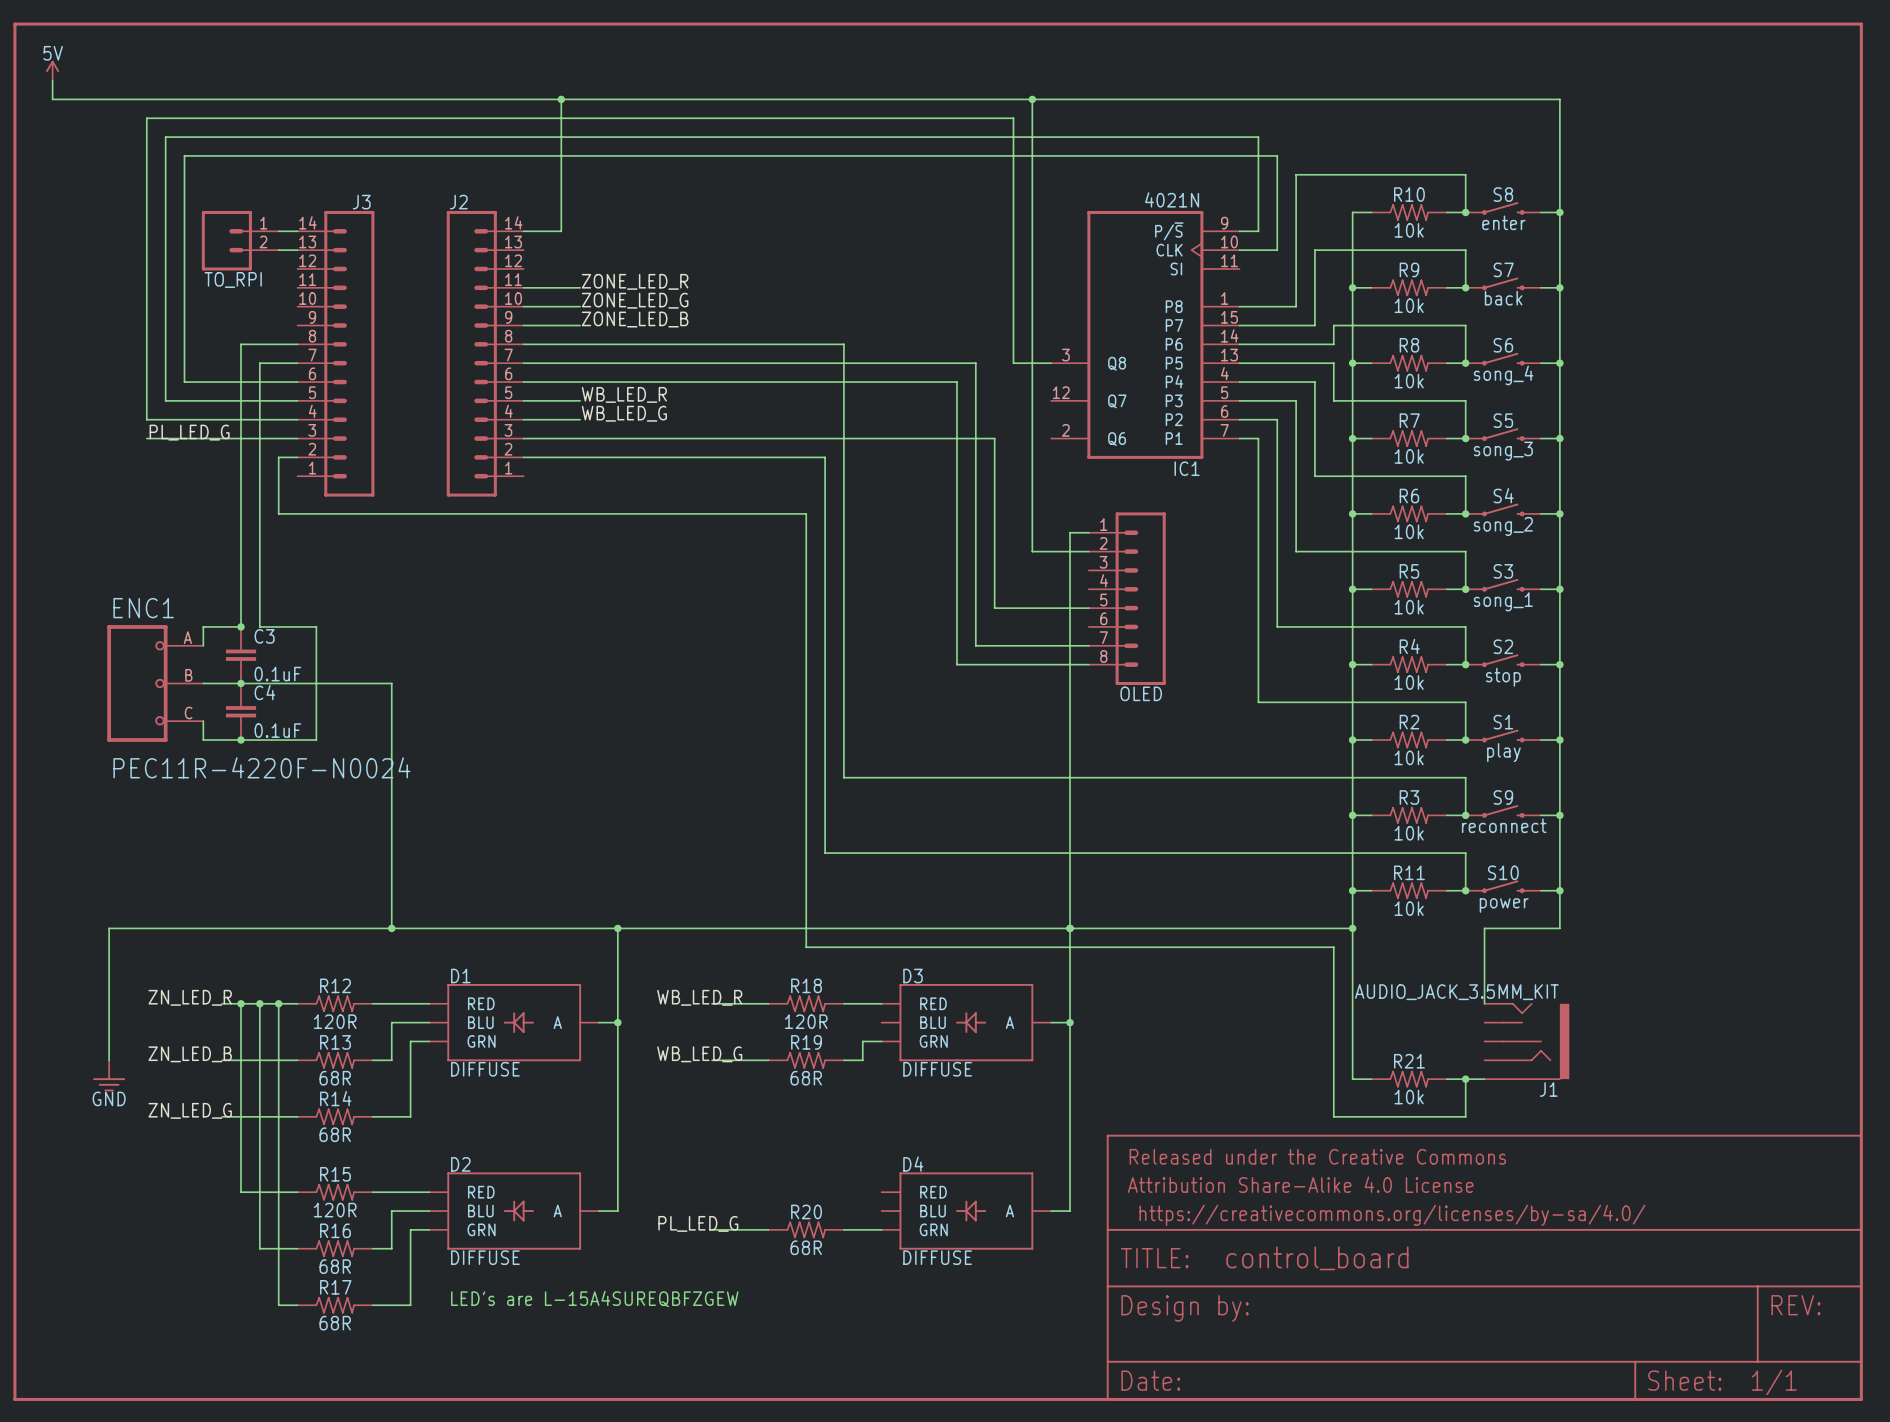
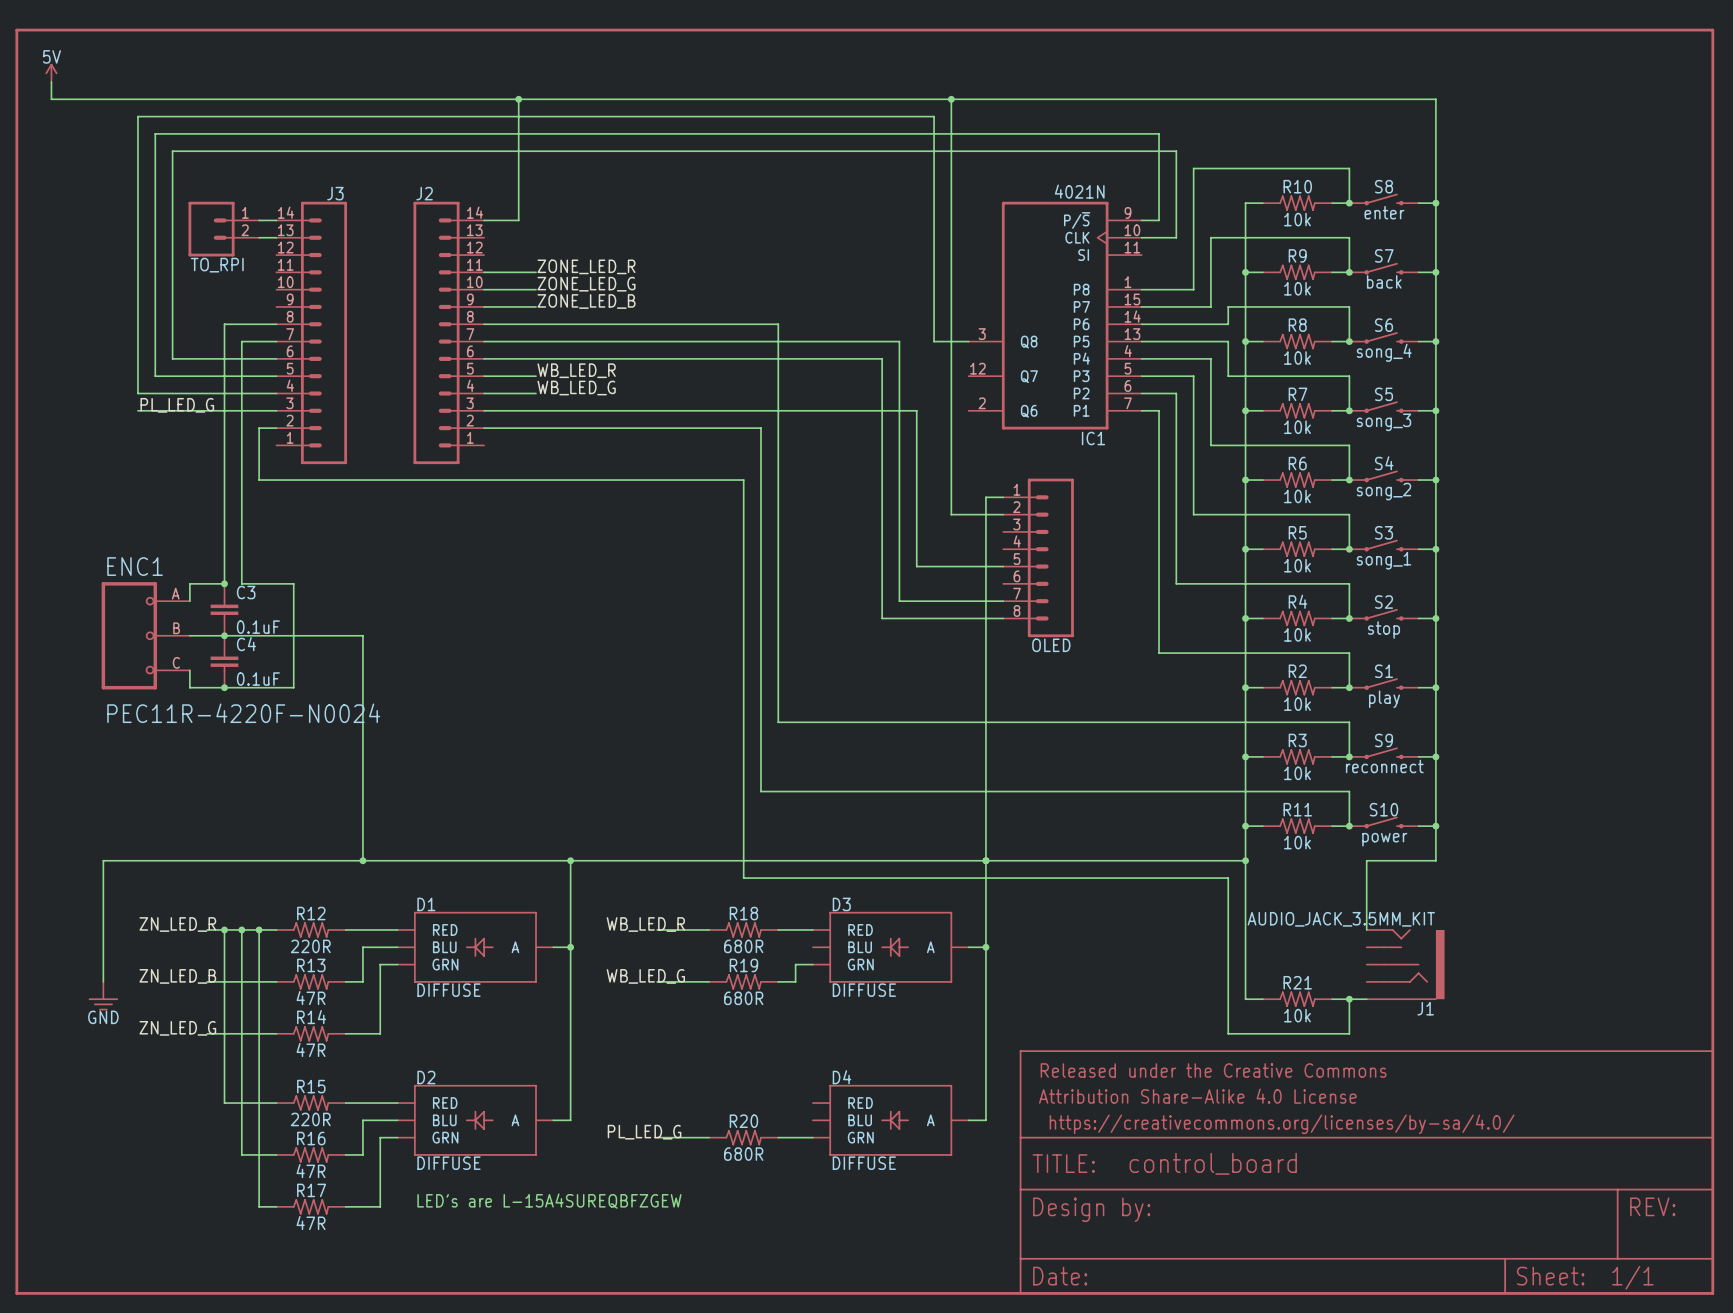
R12 value: 120R (335, 1021) -> 220R (310, 946)
R18 value: 120R (806, 1021) -> 680R (743, 946)
R13 value: 68R (335, 1078) -> 47R (311, 998)
R19 value: 68R (806, 1078) -> 680R (743, 998)
R14 value: 68R (335, 1134) -> 47R (311, 1049)
R15 value: 120R (335, 1210) -> 220R (310, 1119)
R20 value: 68R (806, 1247) -> 680R (743, 1154)
R16 value: 68R (335, 1266) -> 47R (311, 1171)
R17 value: 68R (335, 1323) -> 47R (311, 1223)

